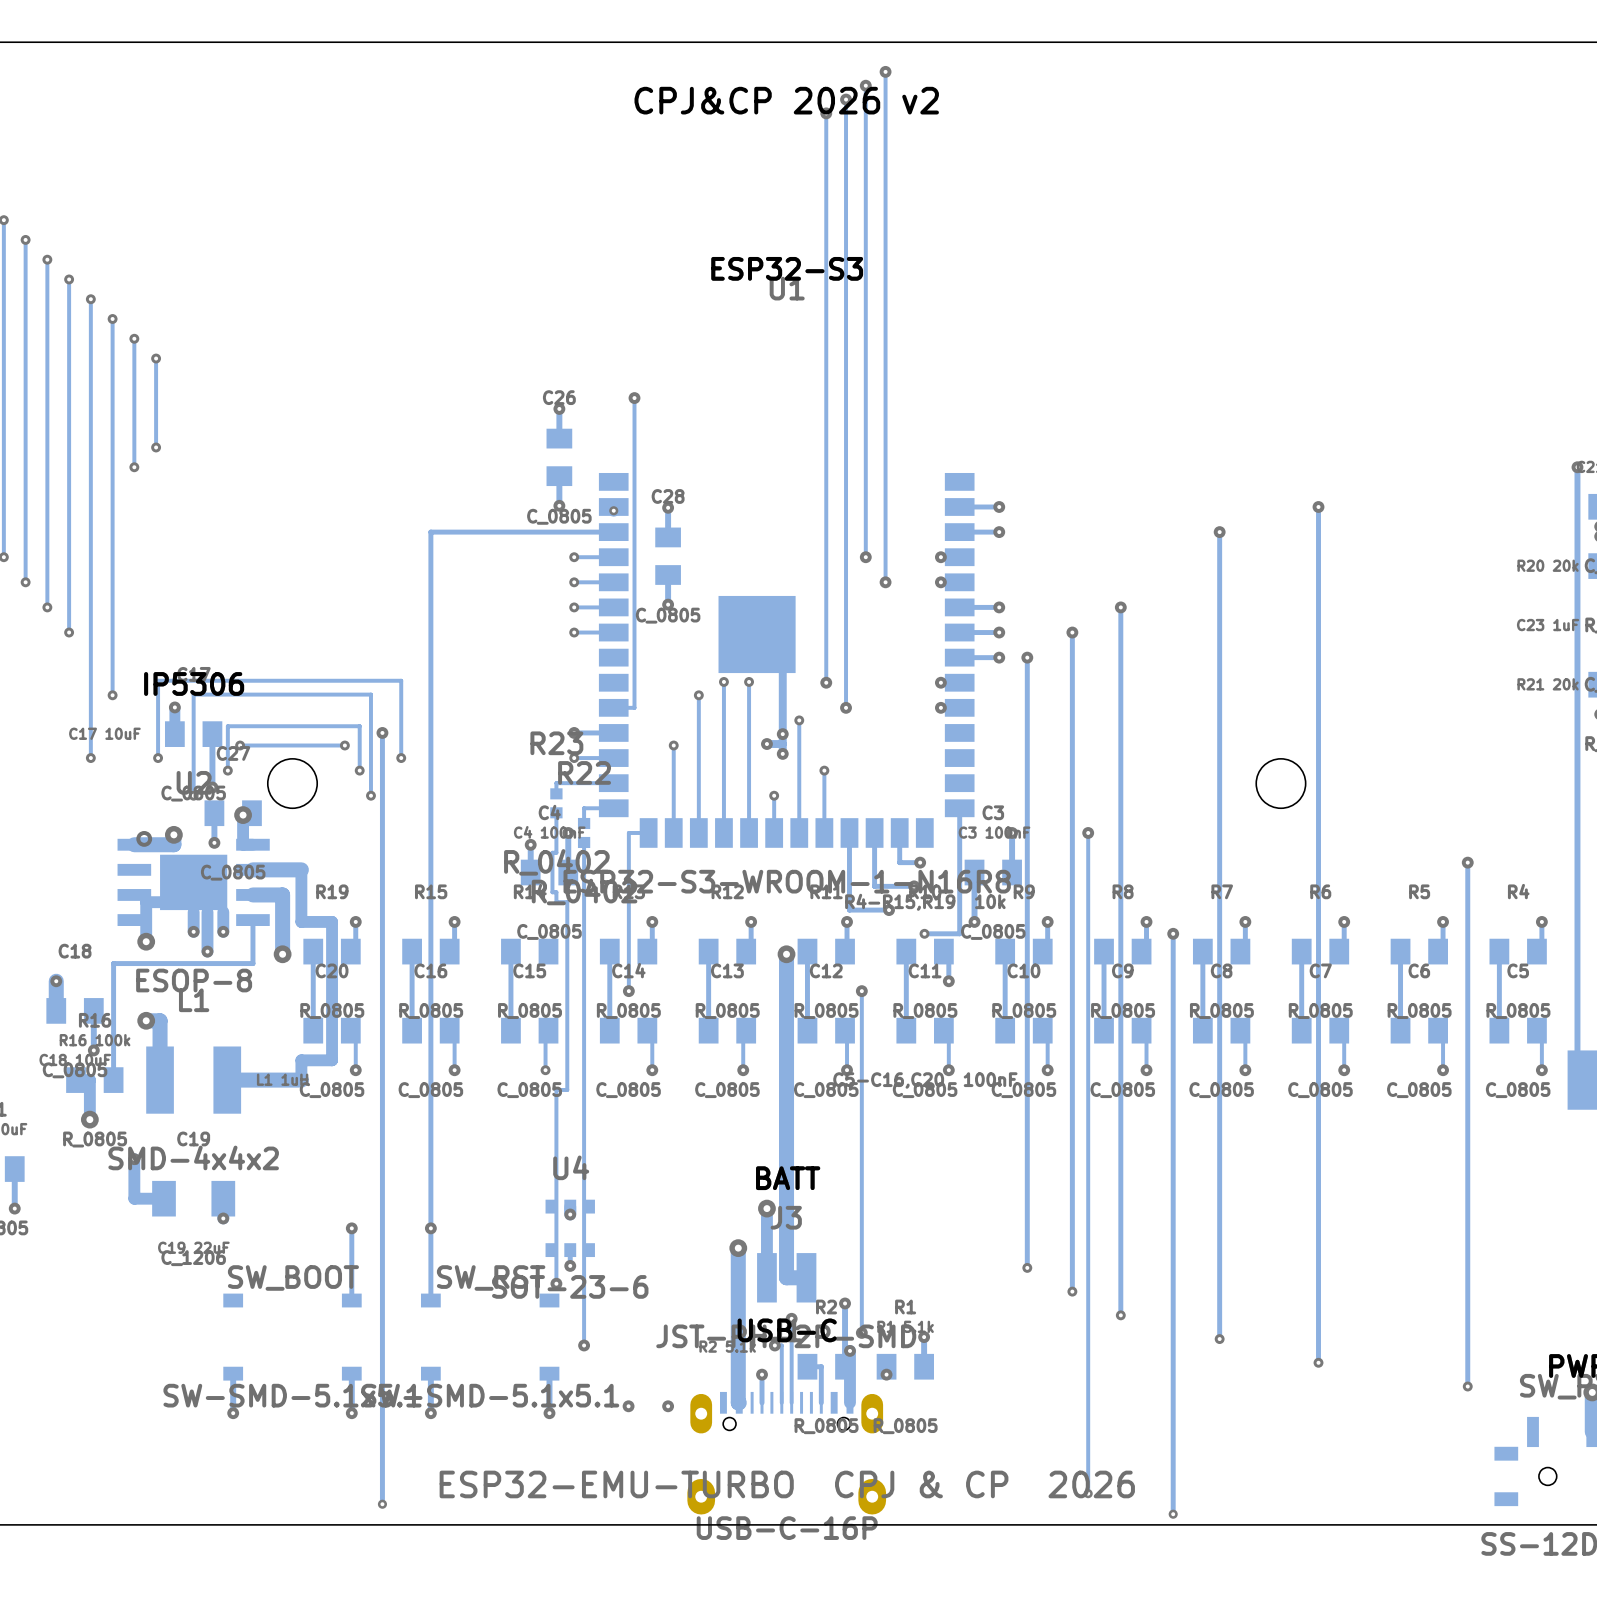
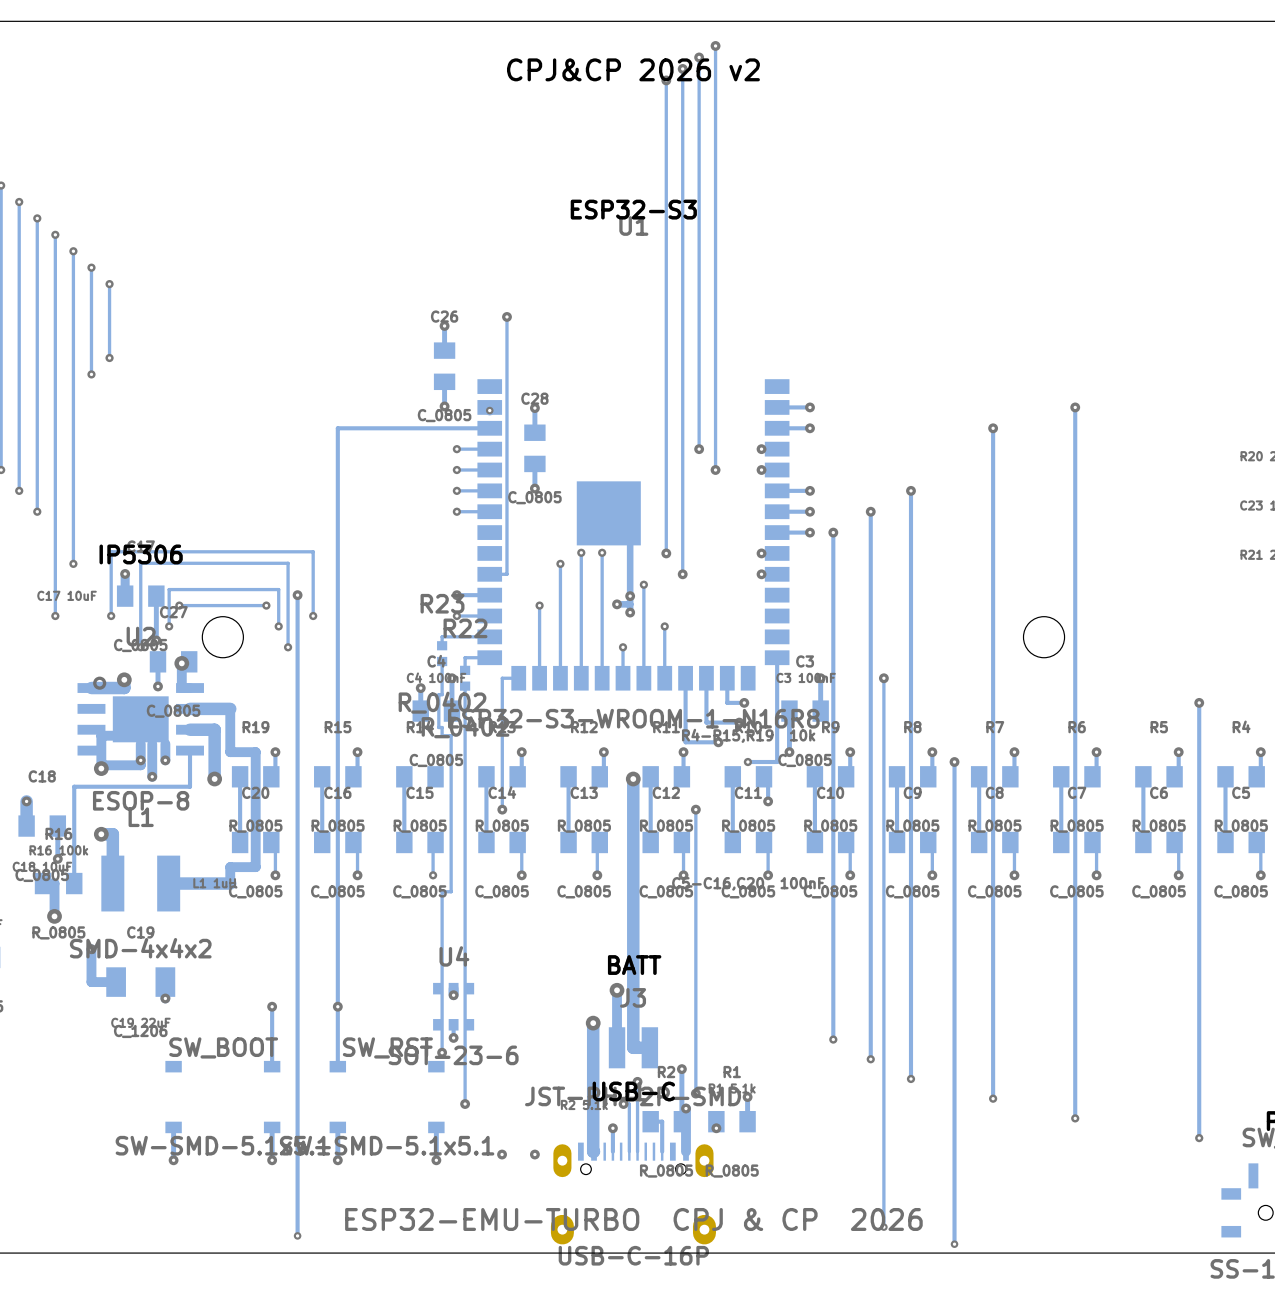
track: none -> (140, 760) (140, 765) (101, 765)

